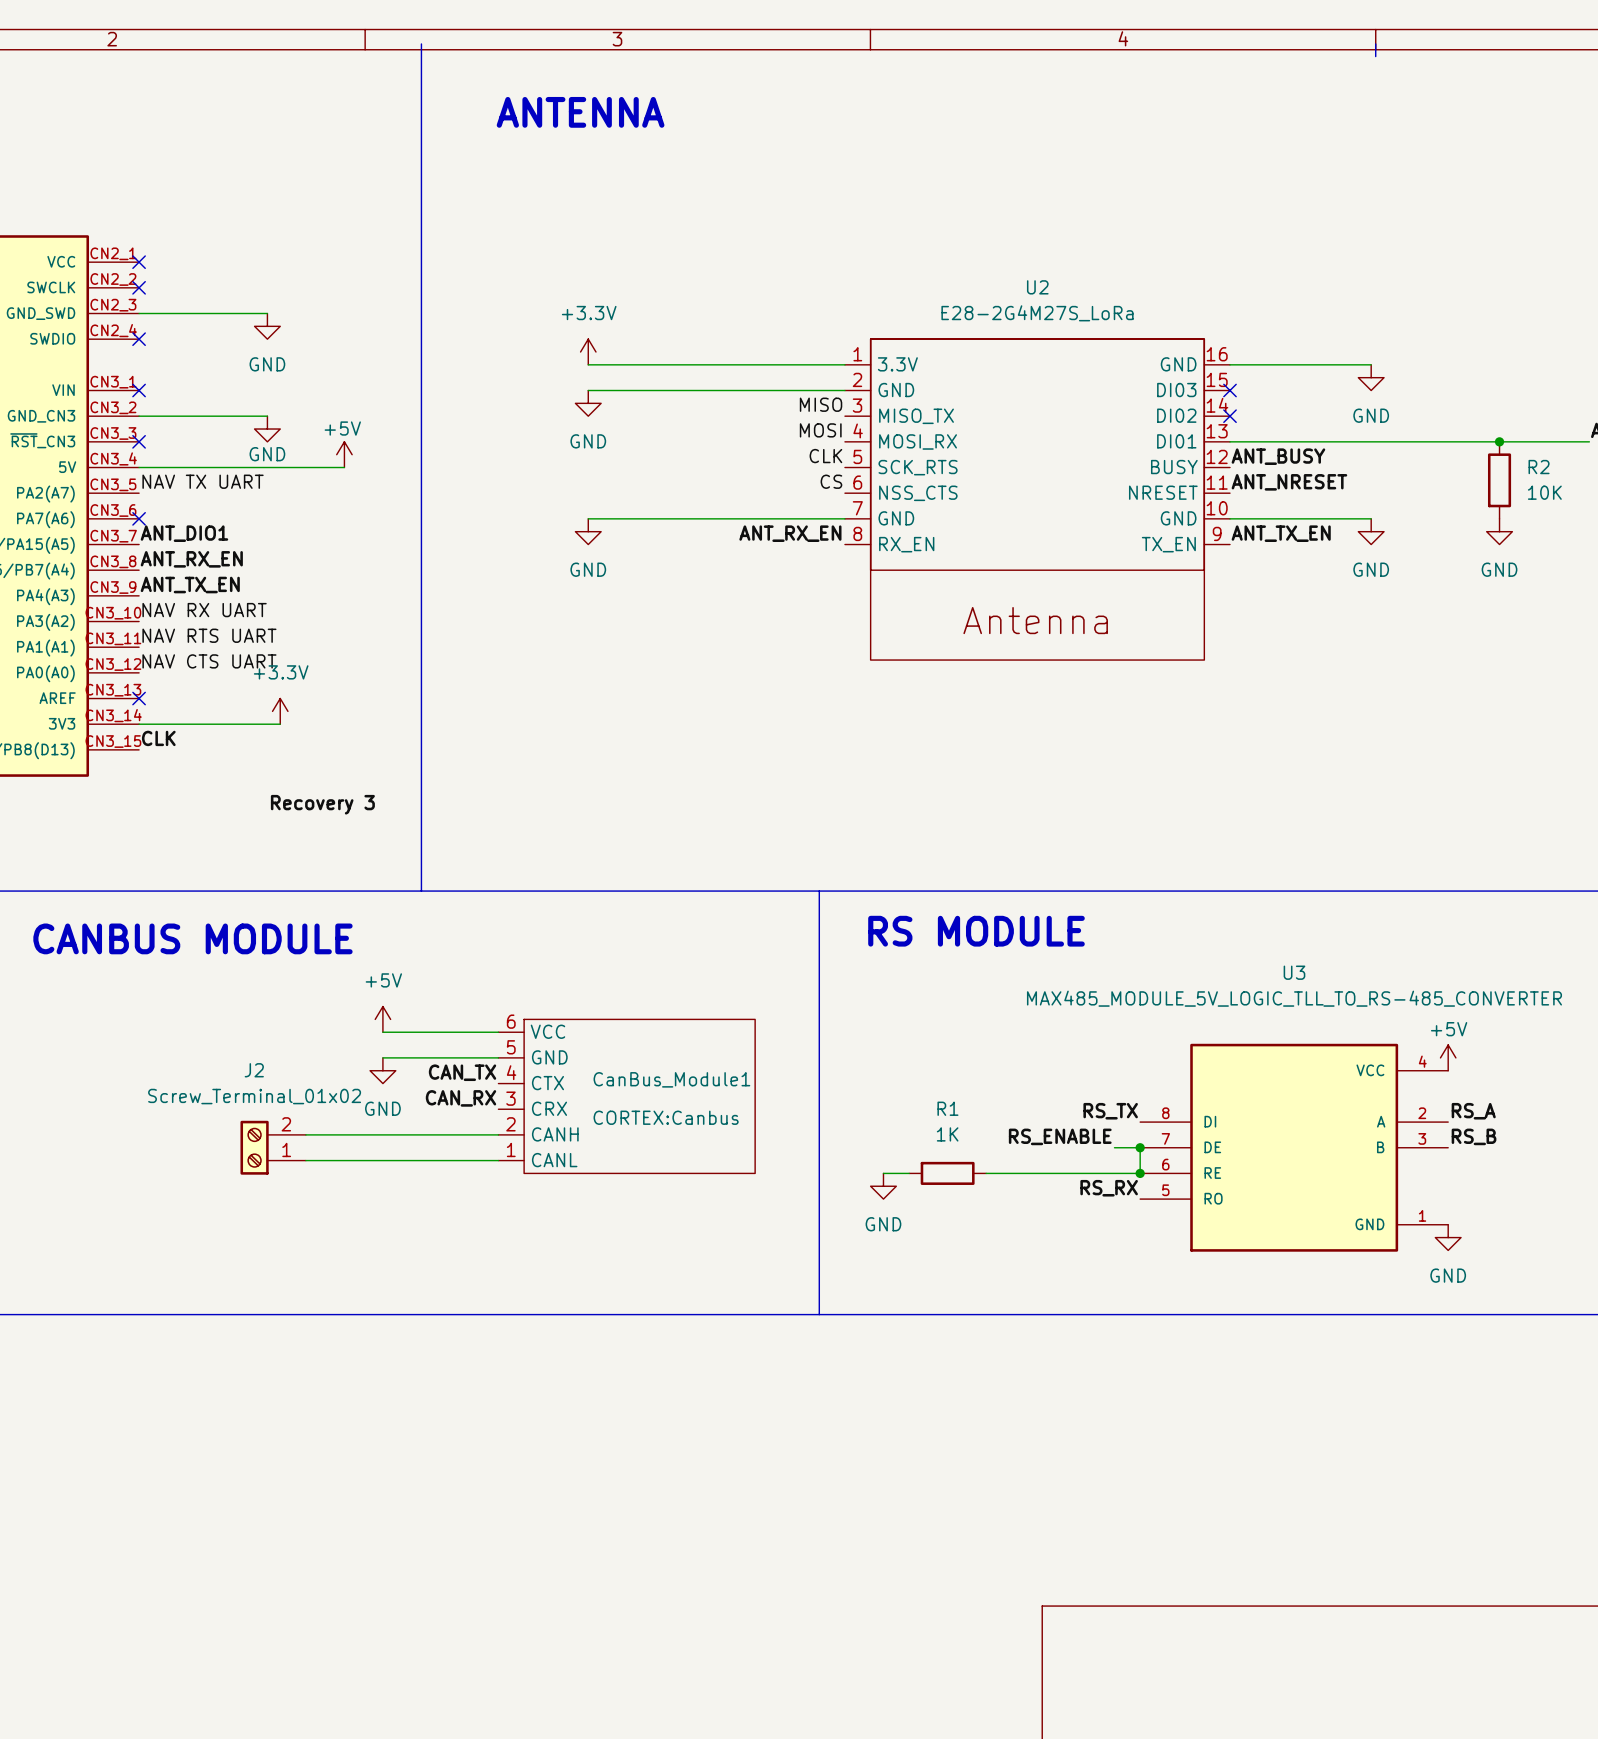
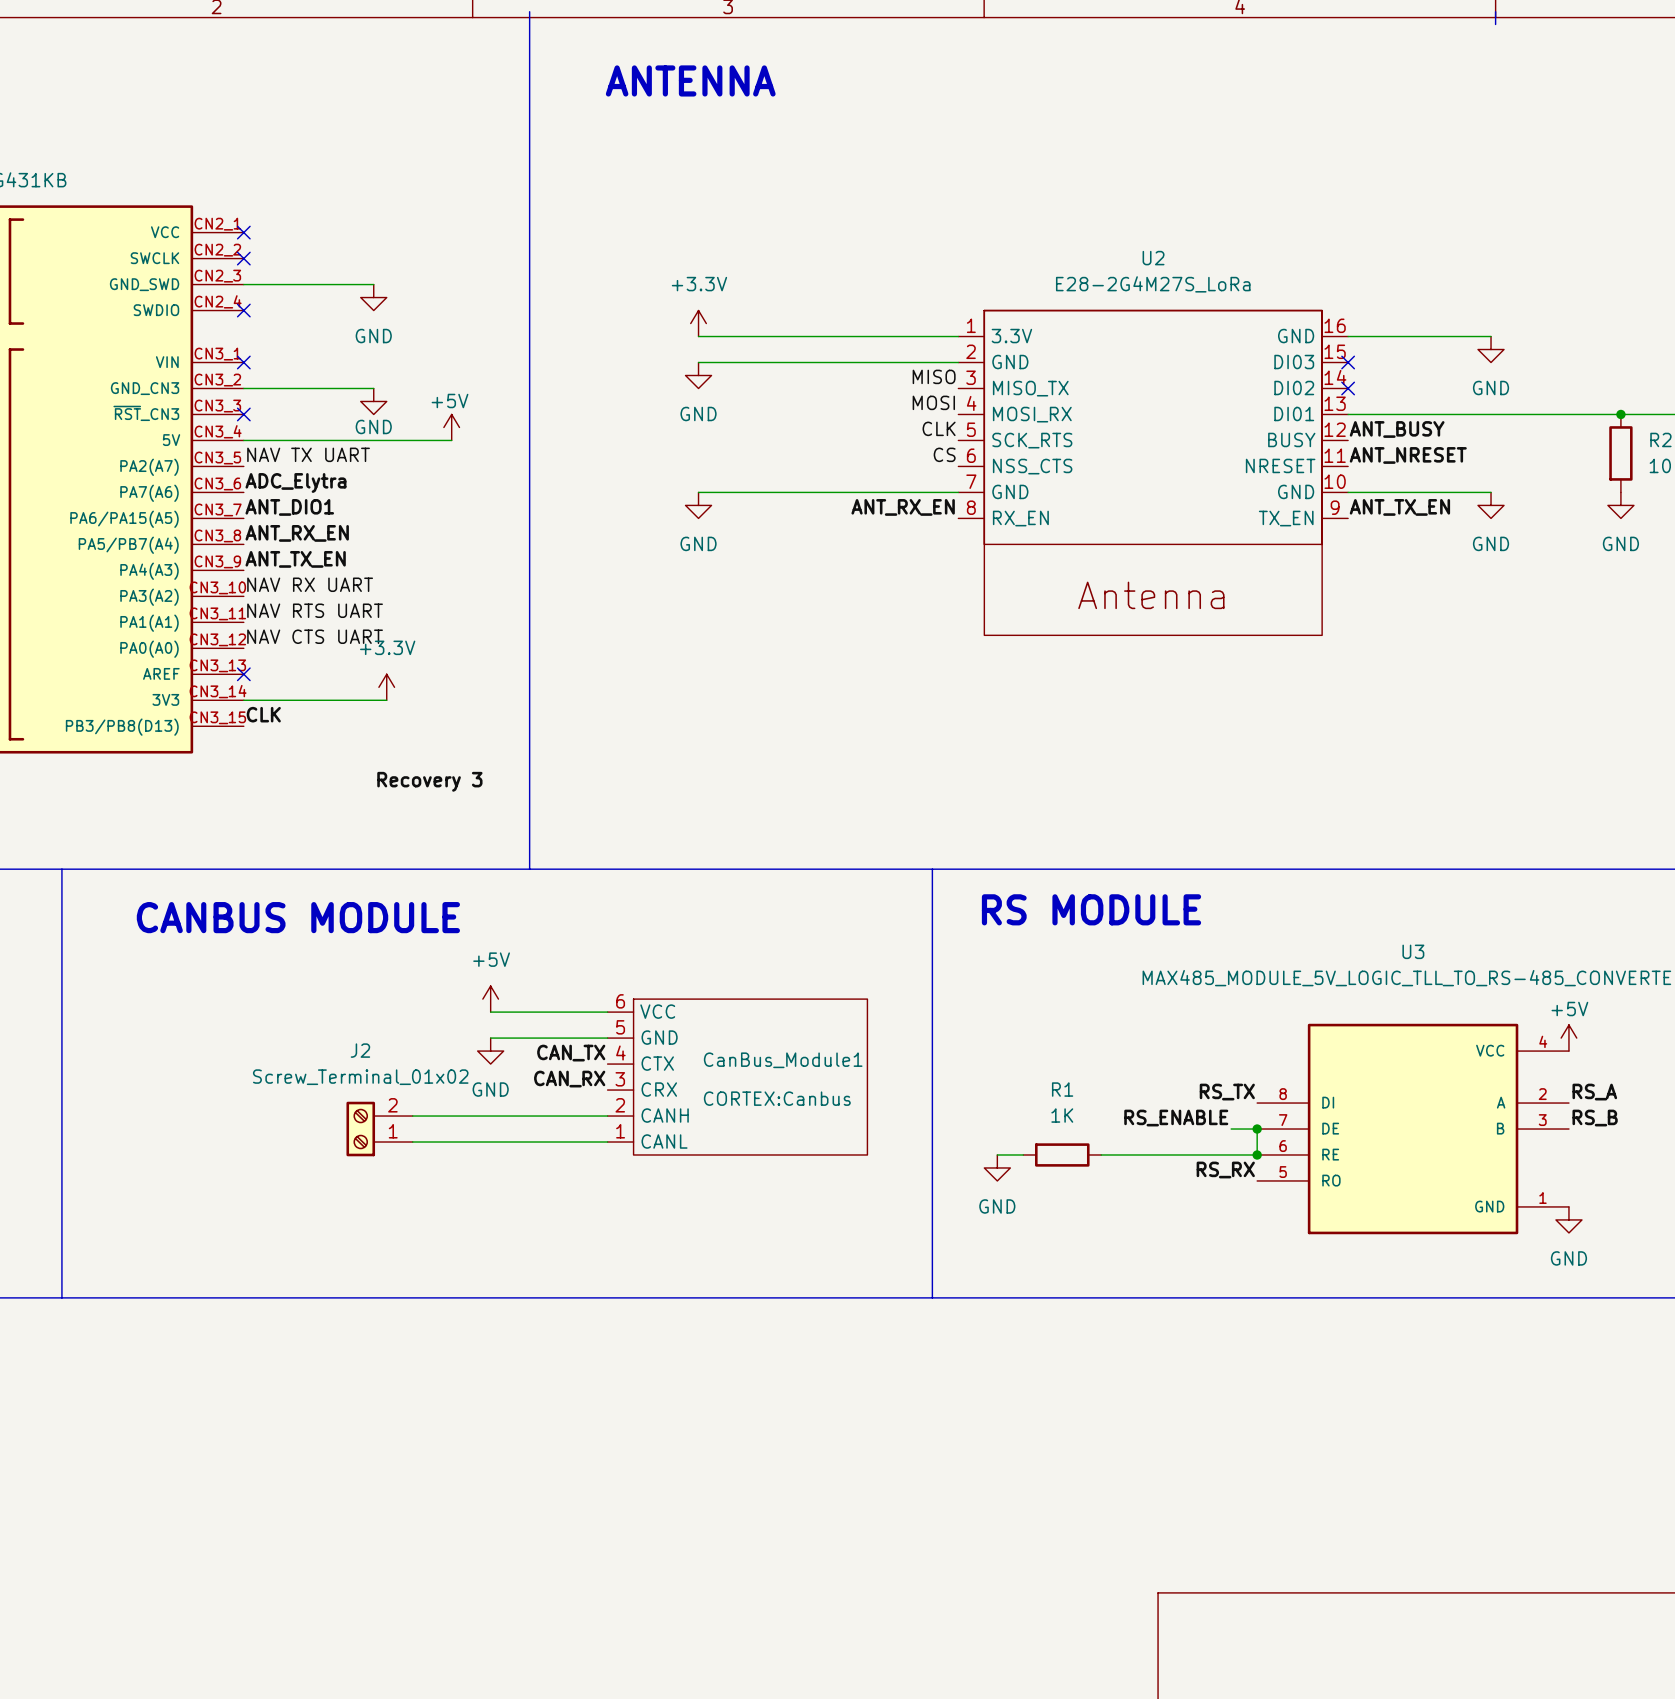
label: none -> ADC_Elytra (295, 482)
no-connect mark: (139, 518) -> none

